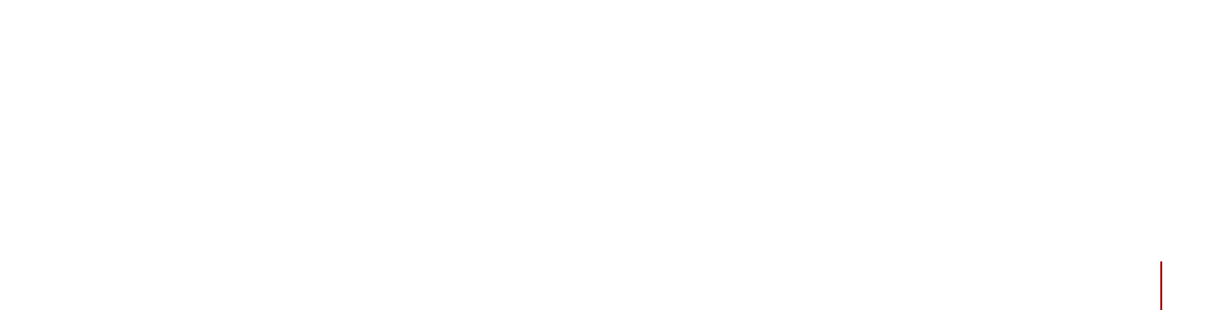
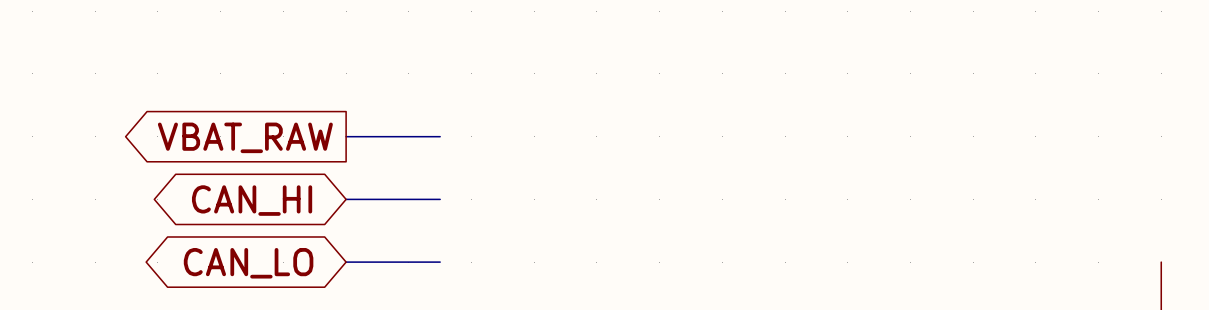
wire: none -> (346, 136) (440, 136)
global label: none -> VBAT_RAW (245, 137)
wire: none -> (346, 199) (440, 199)
global label: none -> CAN_HI (252, 200)
wire: none -> (346, 262) (440, 262)
global label: none -> CAN_LO (248, 263)

